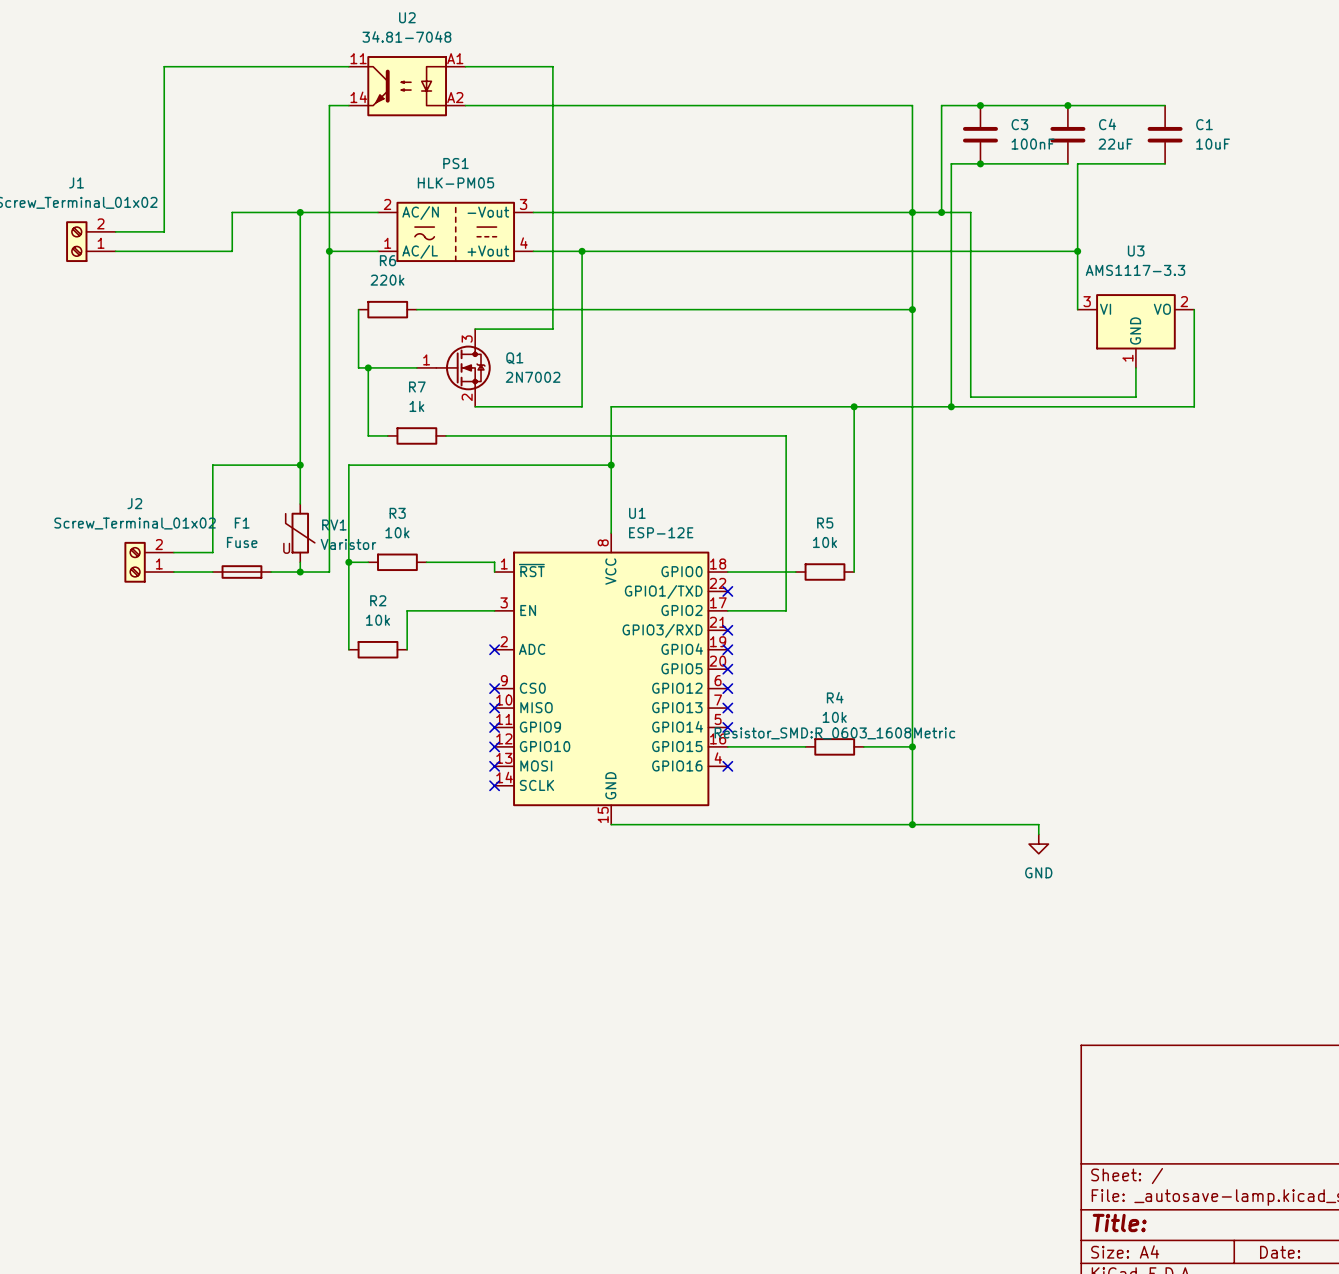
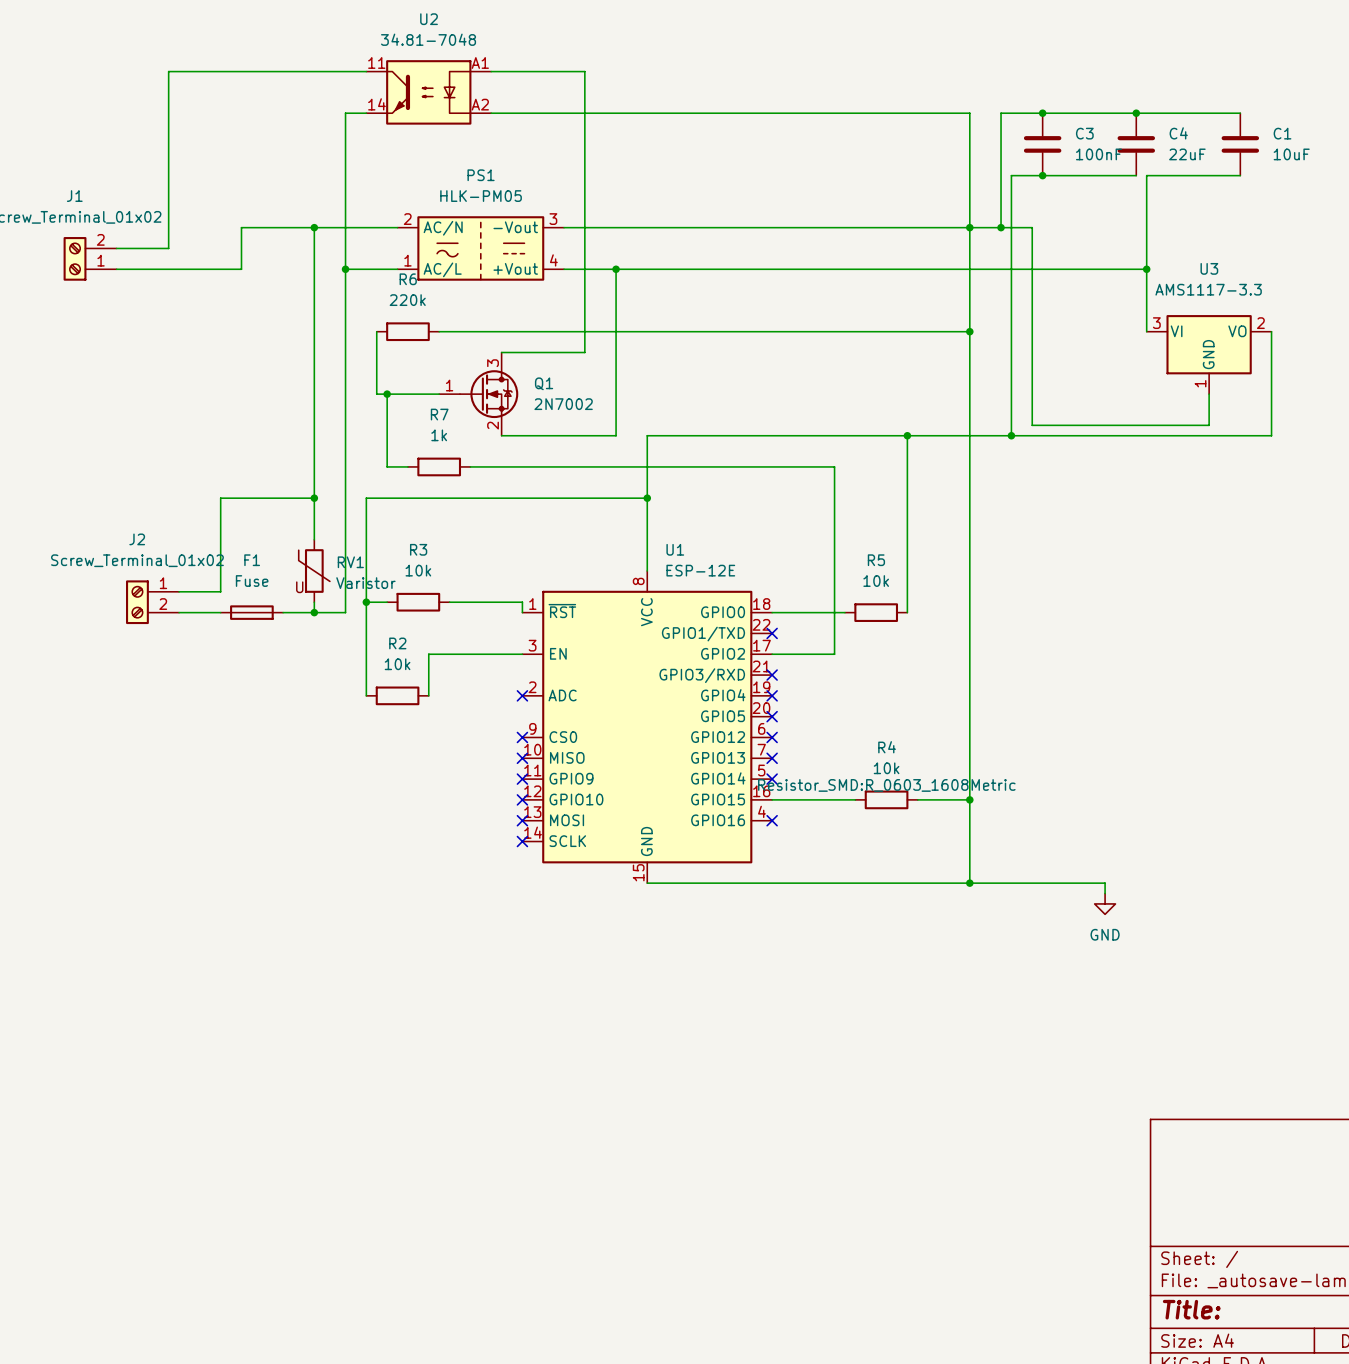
J2 flip: as is (135, 562) -> up-down (137, 602)

